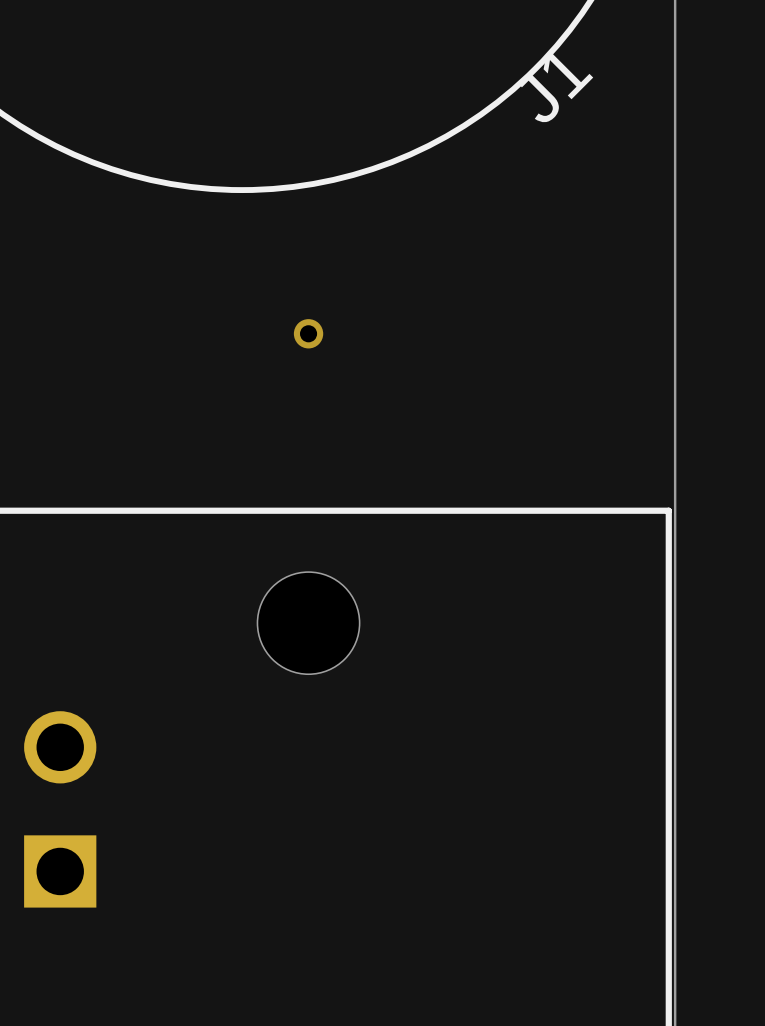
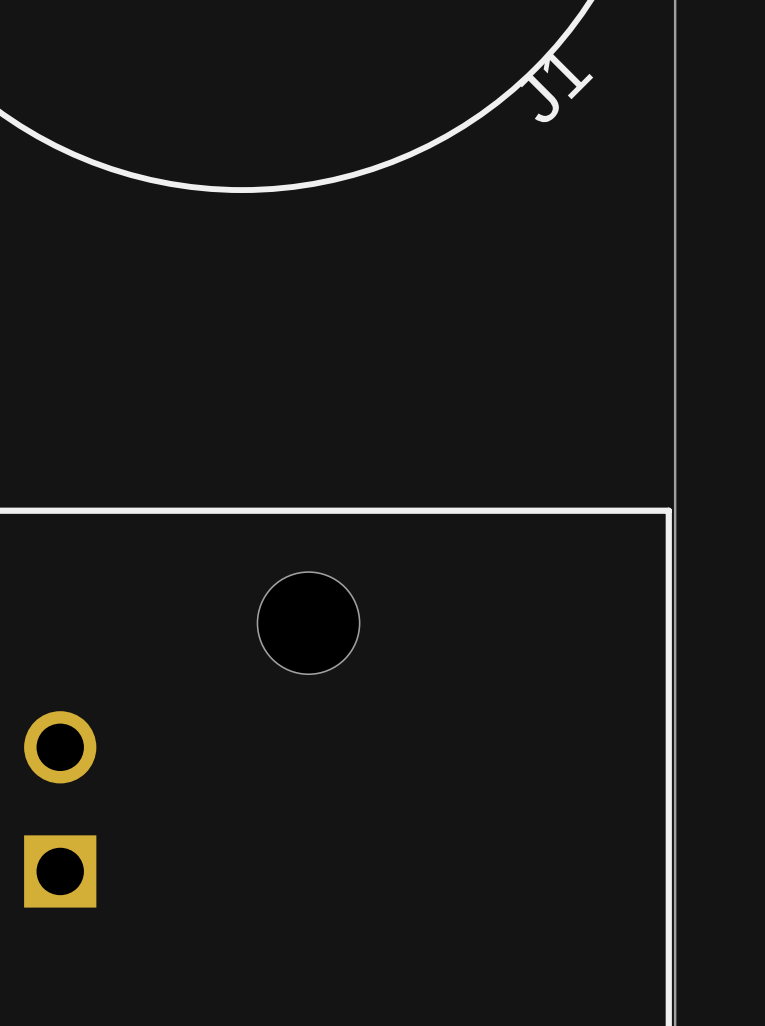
via: (308, 333) -> none

